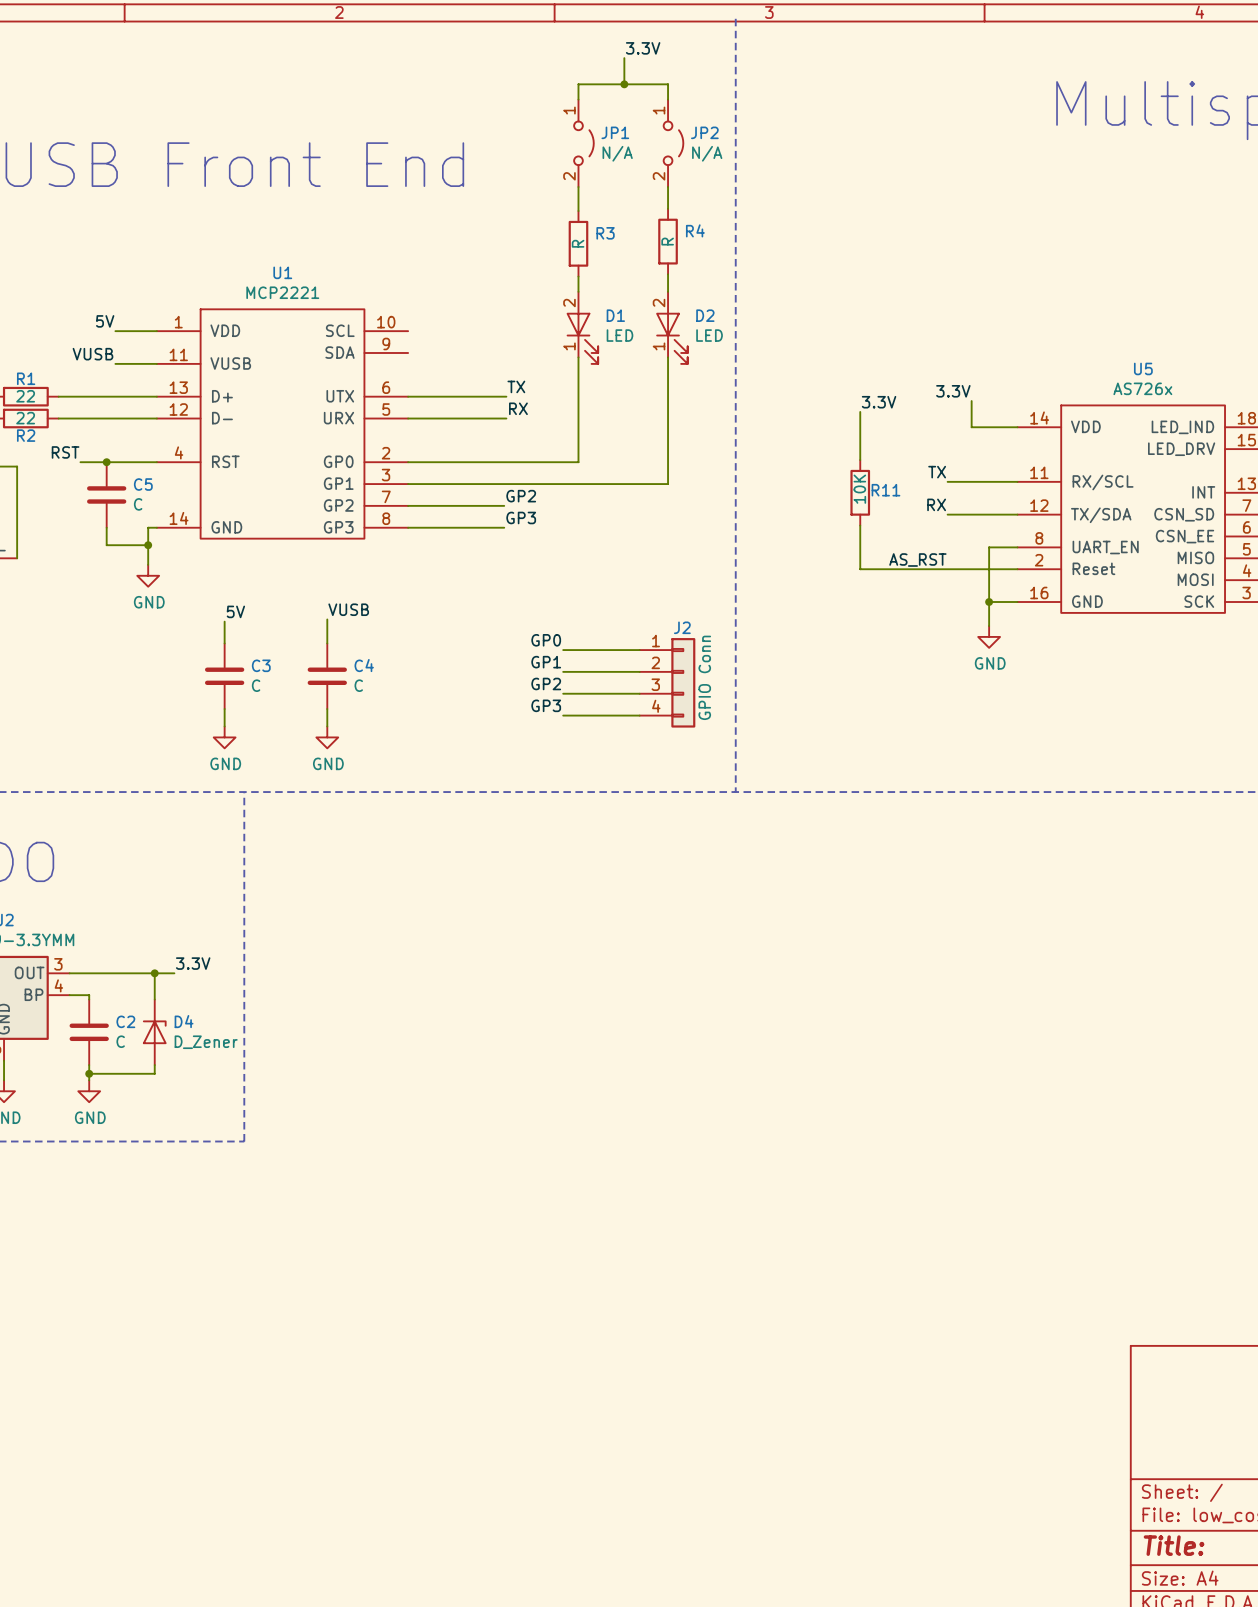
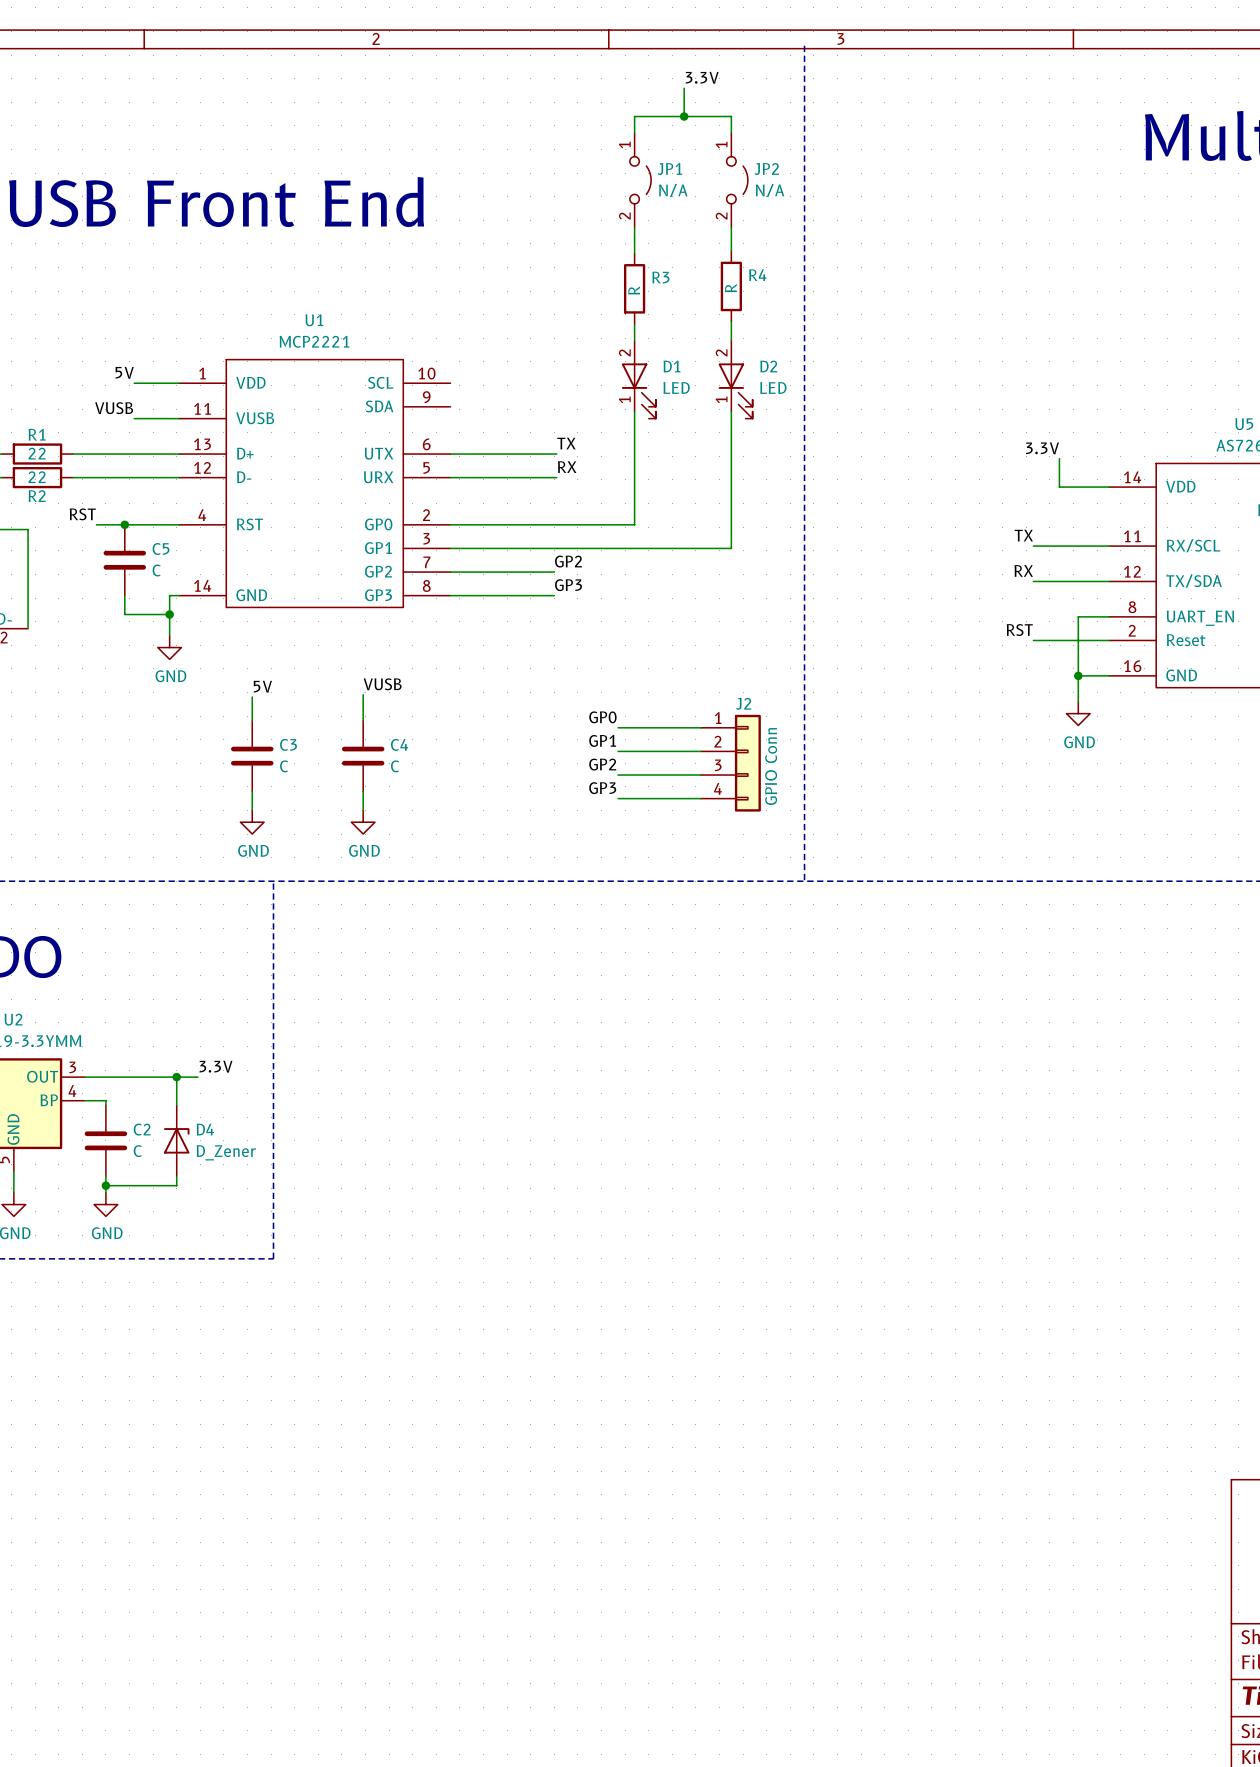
label: 3.3V (879, 402) -> none
wire: (860, 411) (860, 460) -> none
R11: 10K (860, 492) -> none
wire: (860, 525) (860, 569) (947, 569) -> none
label: AS_RST (917, 560) -> RST (1019, 630)

